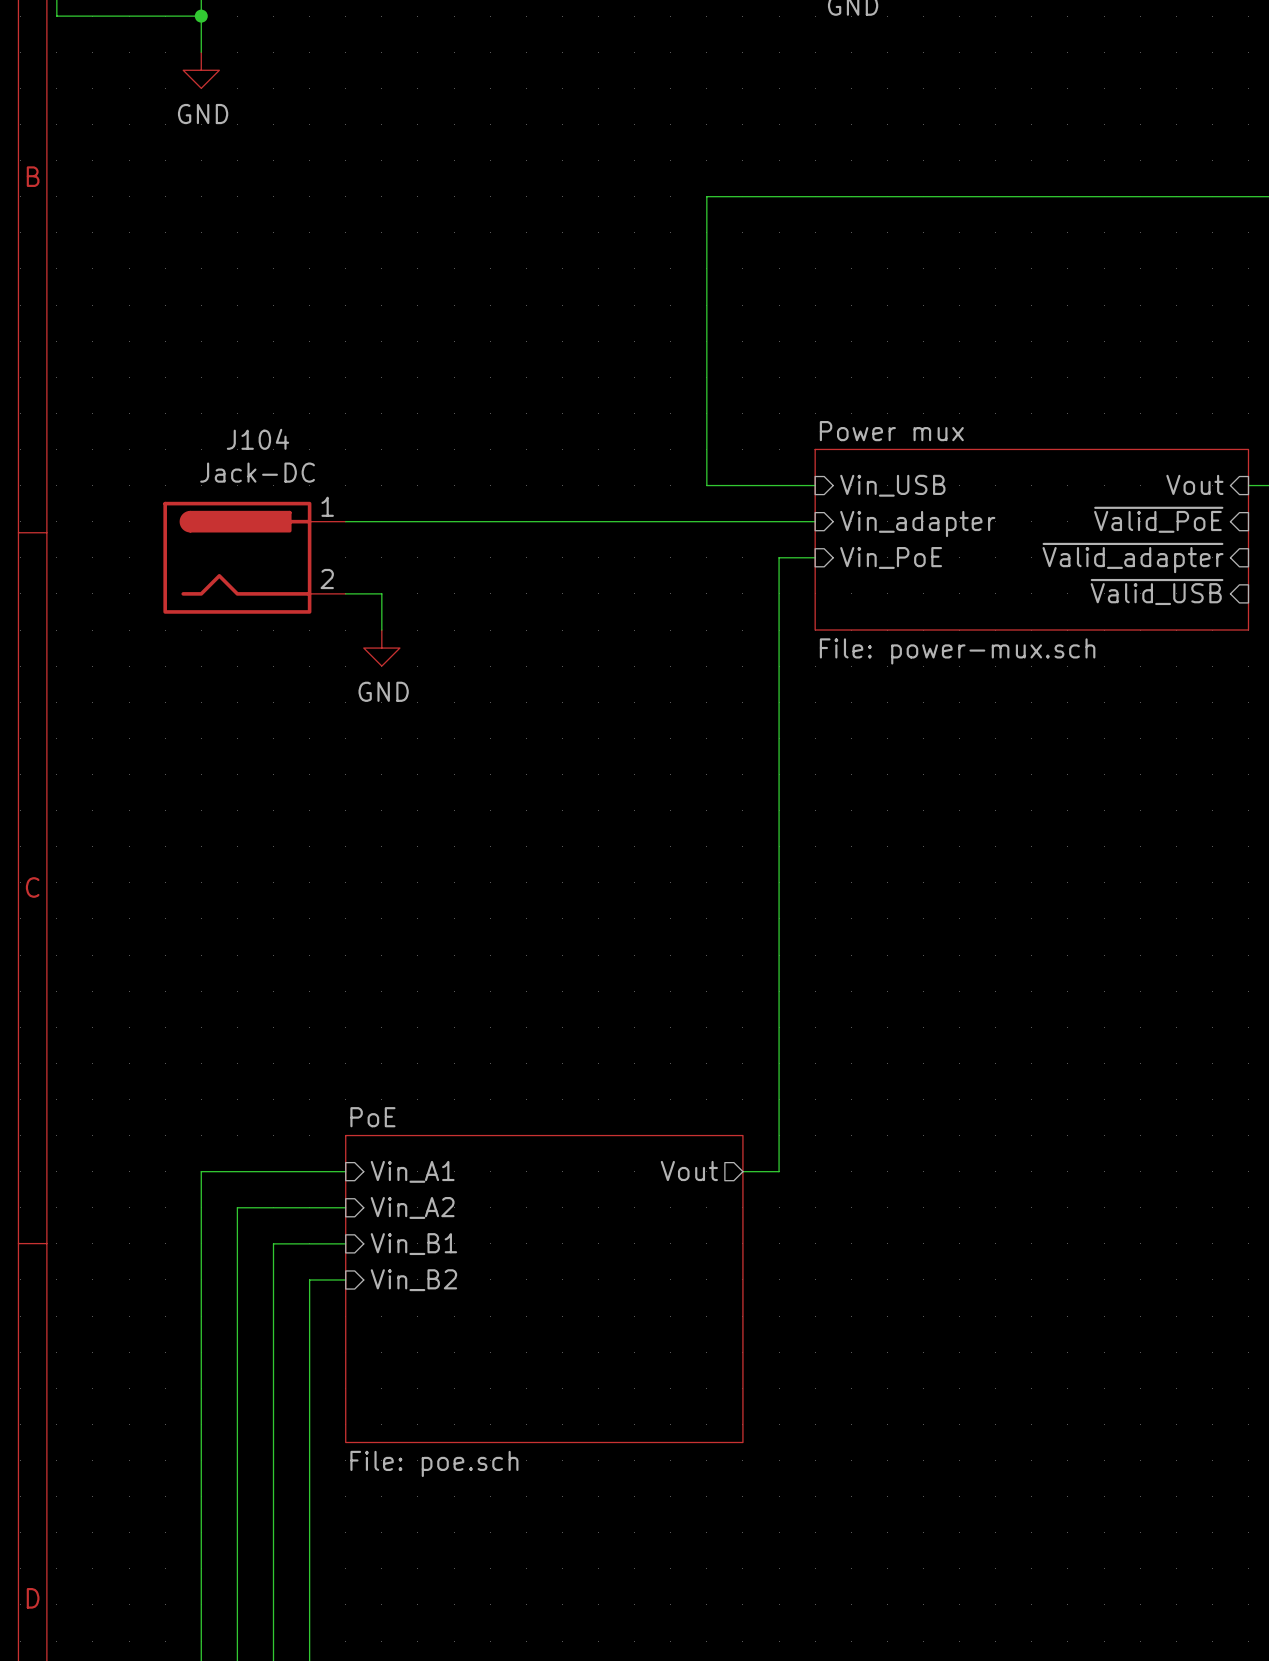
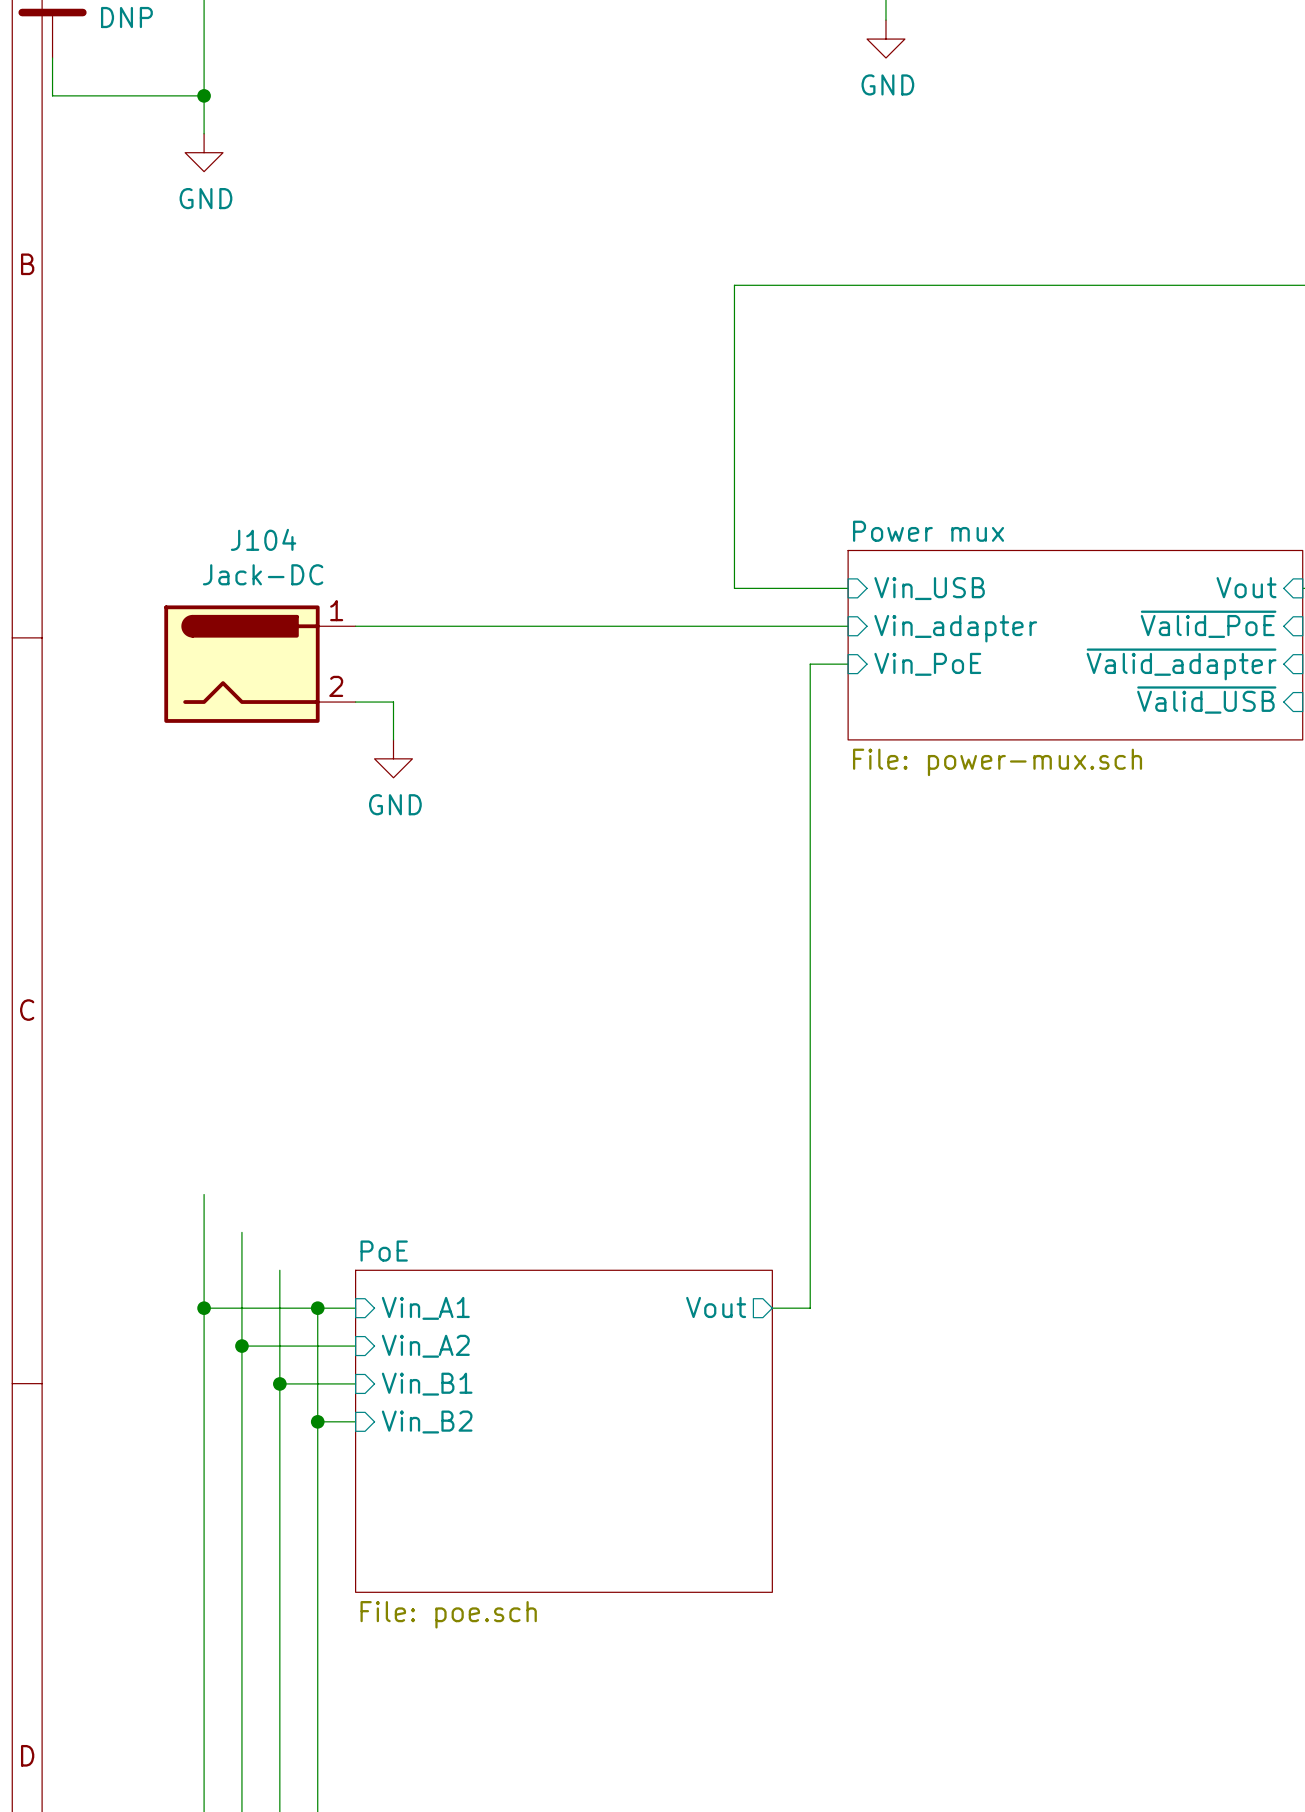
wire: none -> (204, 1194) (204, 1308)
wire: none -> (241, 1232) (241, 1346)
wire: none -> (279, 1270) (279, 1383)
junction: none -> (204, 1308)
wire: none -> (317, 1308) (317, 1421)
junction: none -> (317, 1308)
junction: none -> (241, 1346)
junction: none -> (279, 1383)
junction: none -> (317, 1421)

